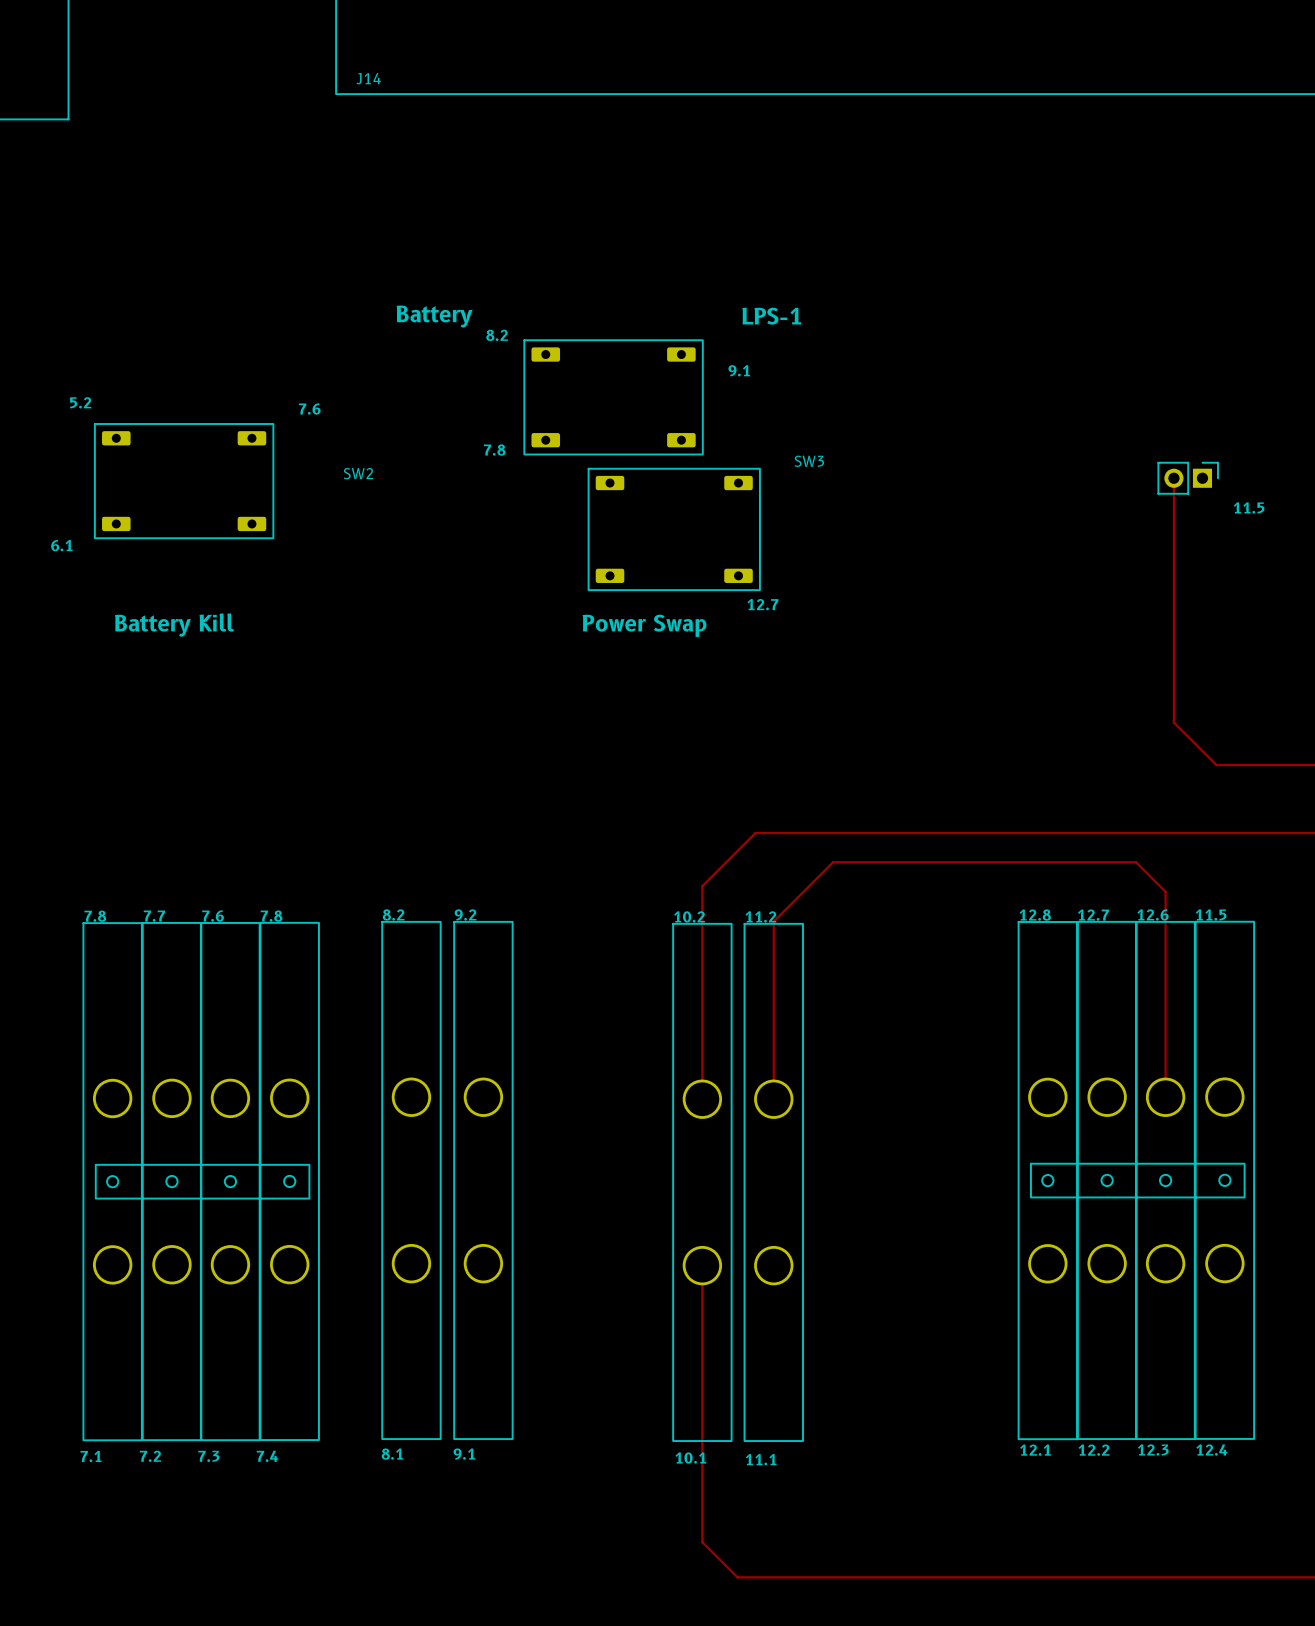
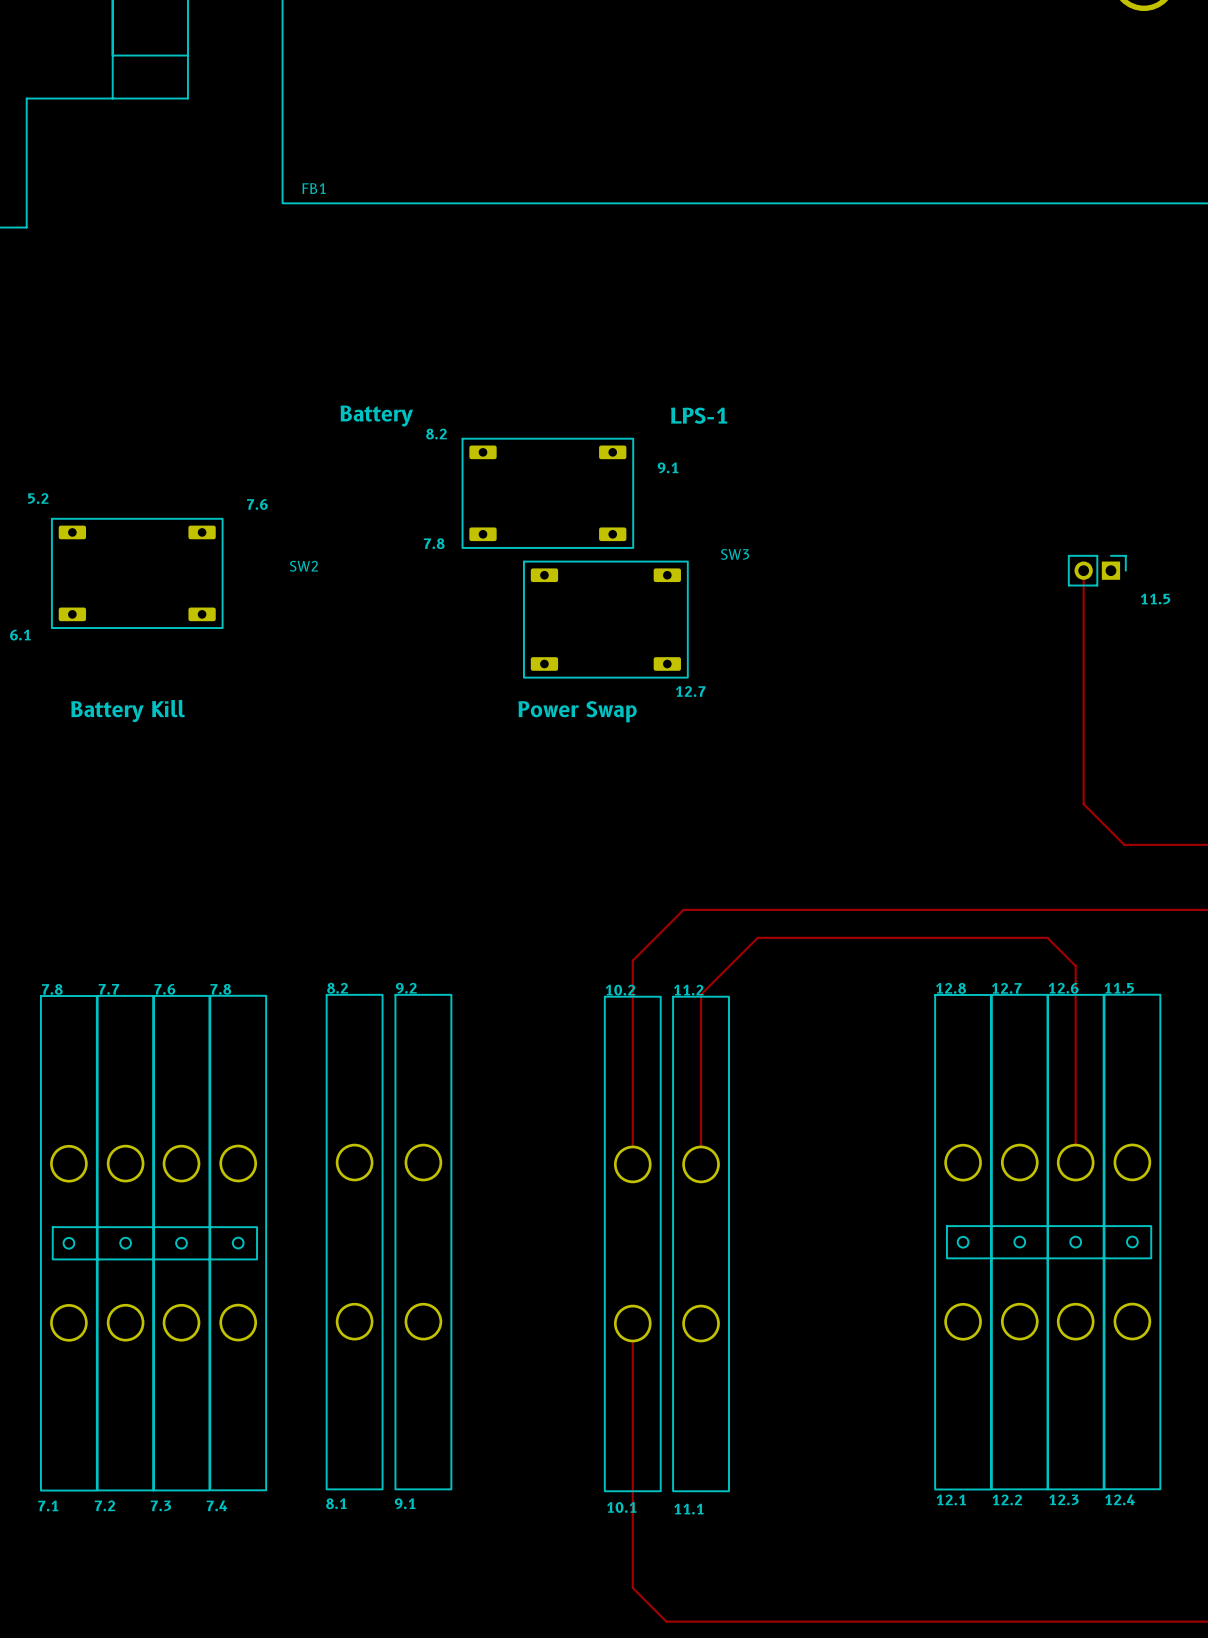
J14 name: J14 (368, 78) -> FB1 (314, 188)

